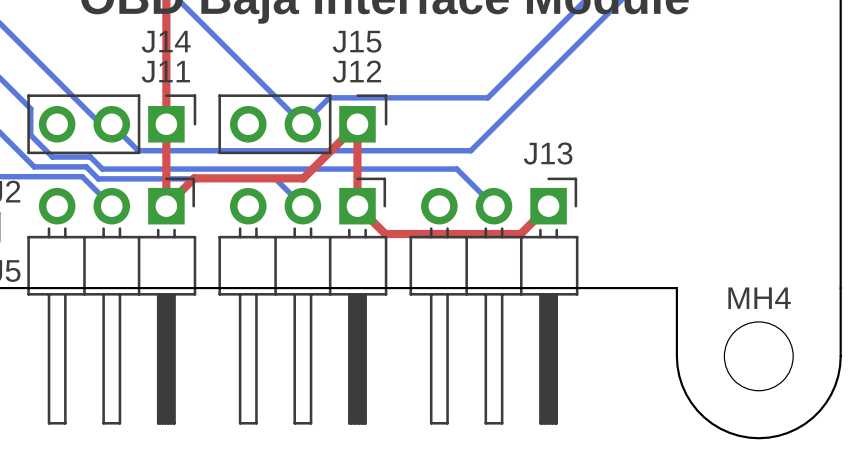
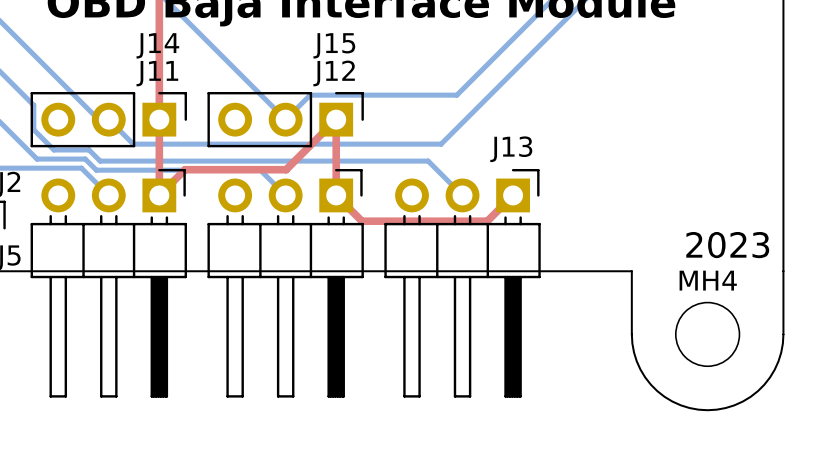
text: none -> 2023 (727, 245)

